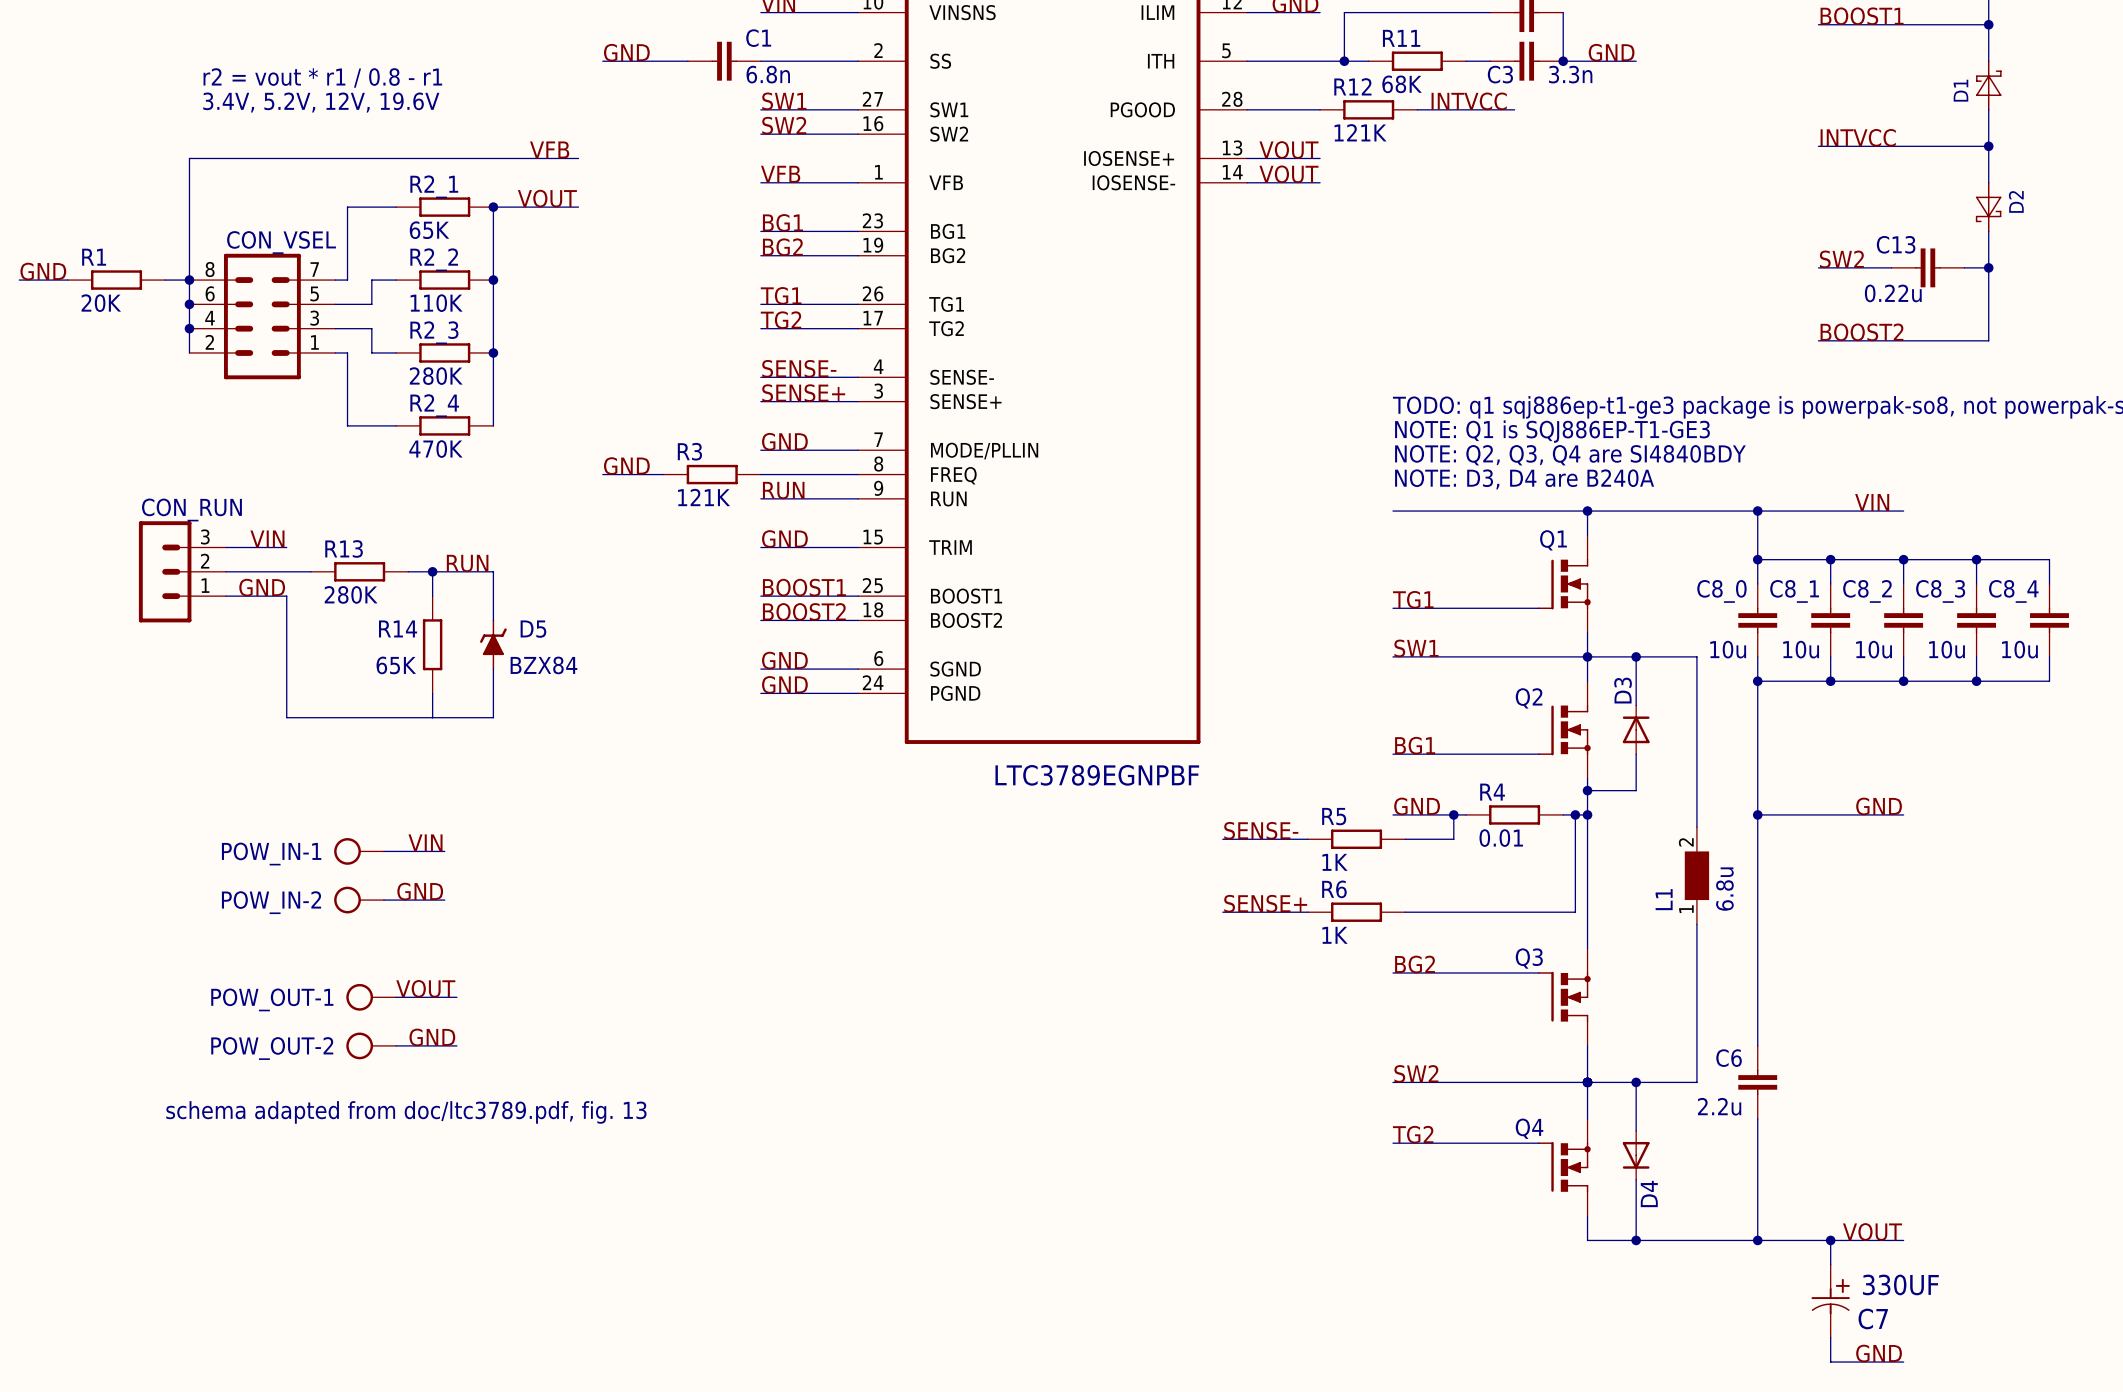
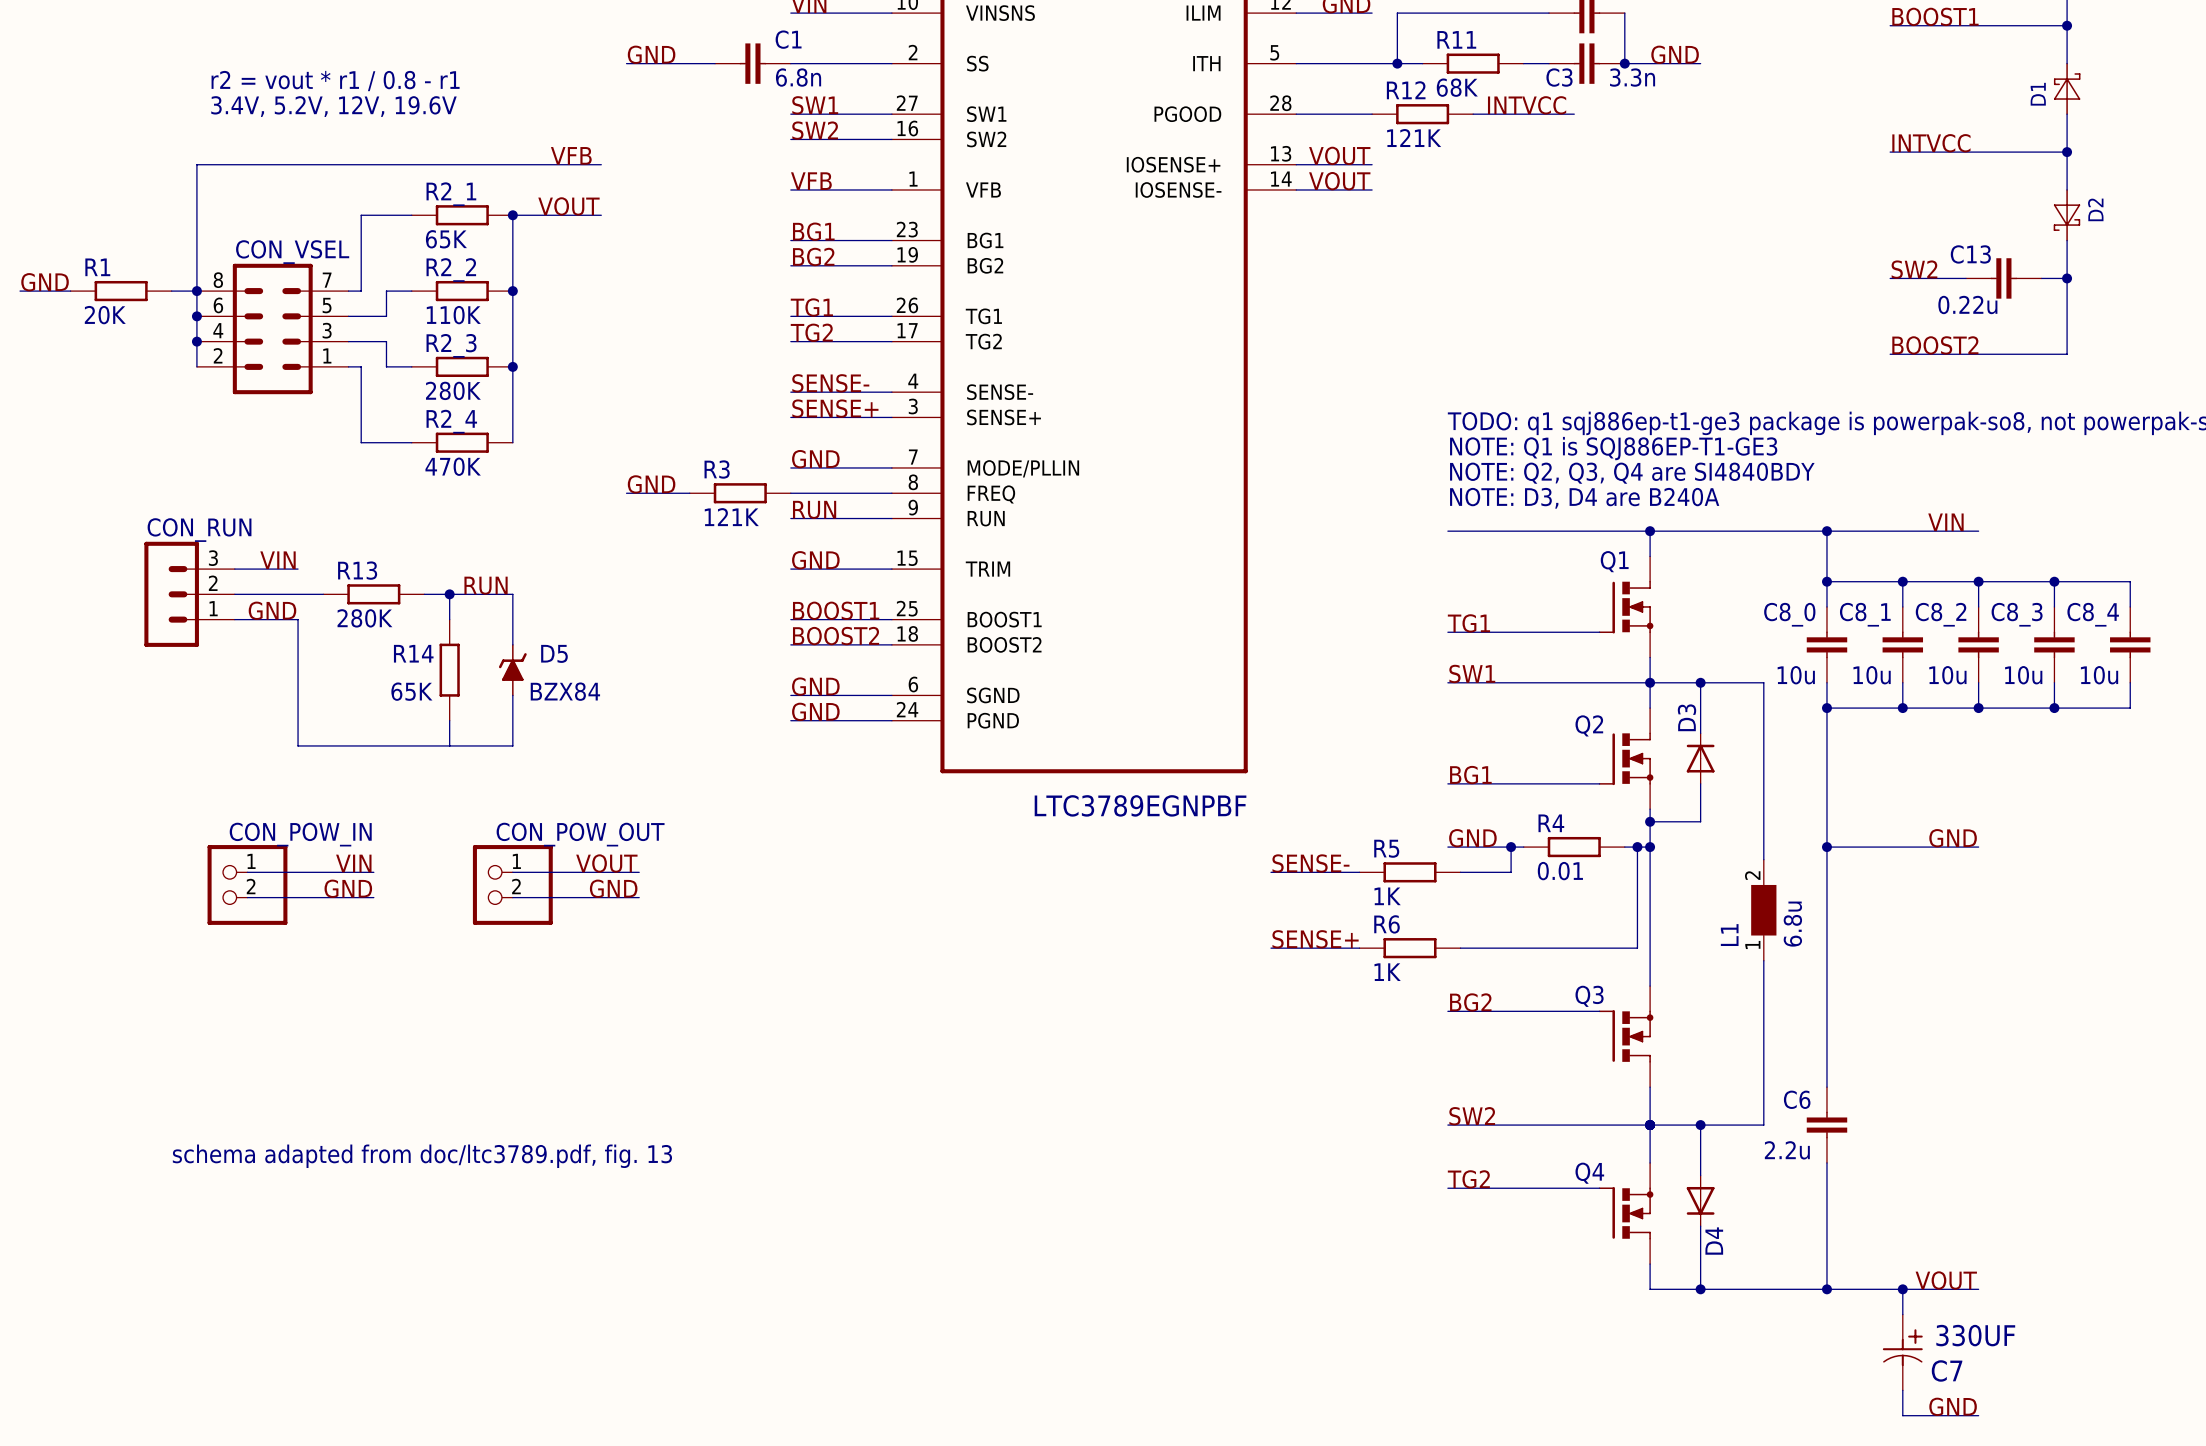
wire: none -> (247, 872) (373, 872)
wire: none -> (512, 872) (639, 872)
label position: VIN (425, 842) -> VIN (353, 863)
CON_POW_IN: none -> (247, 884)
POW_IN-1: (359, 851) -> none
wire: (383, 851) (444, 851) -> none
CON_POW_OUT: none -> (512, 884)
label: none -> GND (348, 888)
label: none -> GND (613, 888)
wire: none -> (247, 897) (373, 897)
wire: none -> (512, 897) (639, 897)
label: GND (420, 891) -> none
POW_IN-2: (359, 900) -> none
wire: (383, 900) (444, 900) -> none
label position: VOUT (425, 988) -> VOUT (606, 863)
POW_OUT-1: (371, 997) -> none
wire: (396, 997) (456, 997) -> none
label: GND (432, 1037) -> none
POW_OUT-2: (371, 1045) -> none
wire: (396, 1045) (456, 1045) -> none

